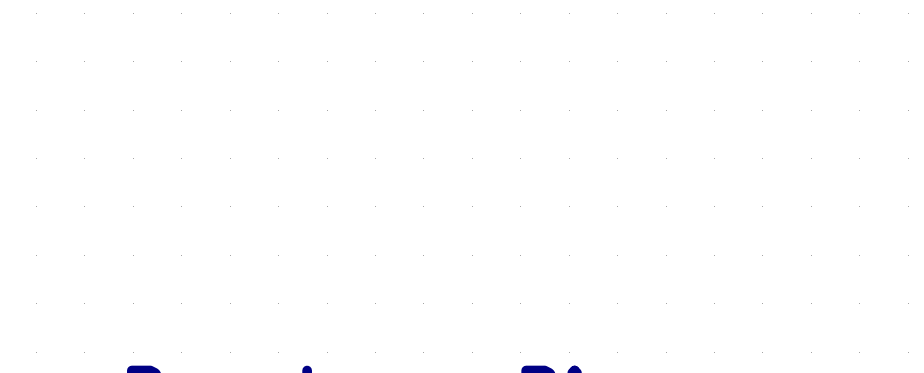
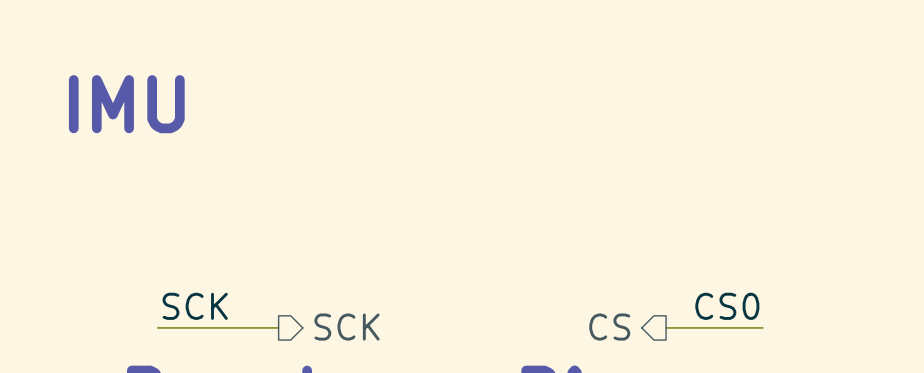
text: none -> IMU (126, 104)
label: none -> SCK (195, 306)
label: none -> CS0 (727, 306)
wire: none -> (157, 327) (278, 327)
sheet pin: none -> SCK (347, 327)
sheet pin: none -> CS (609, 327)
wire: none -> (666, 327) (762, 327)

